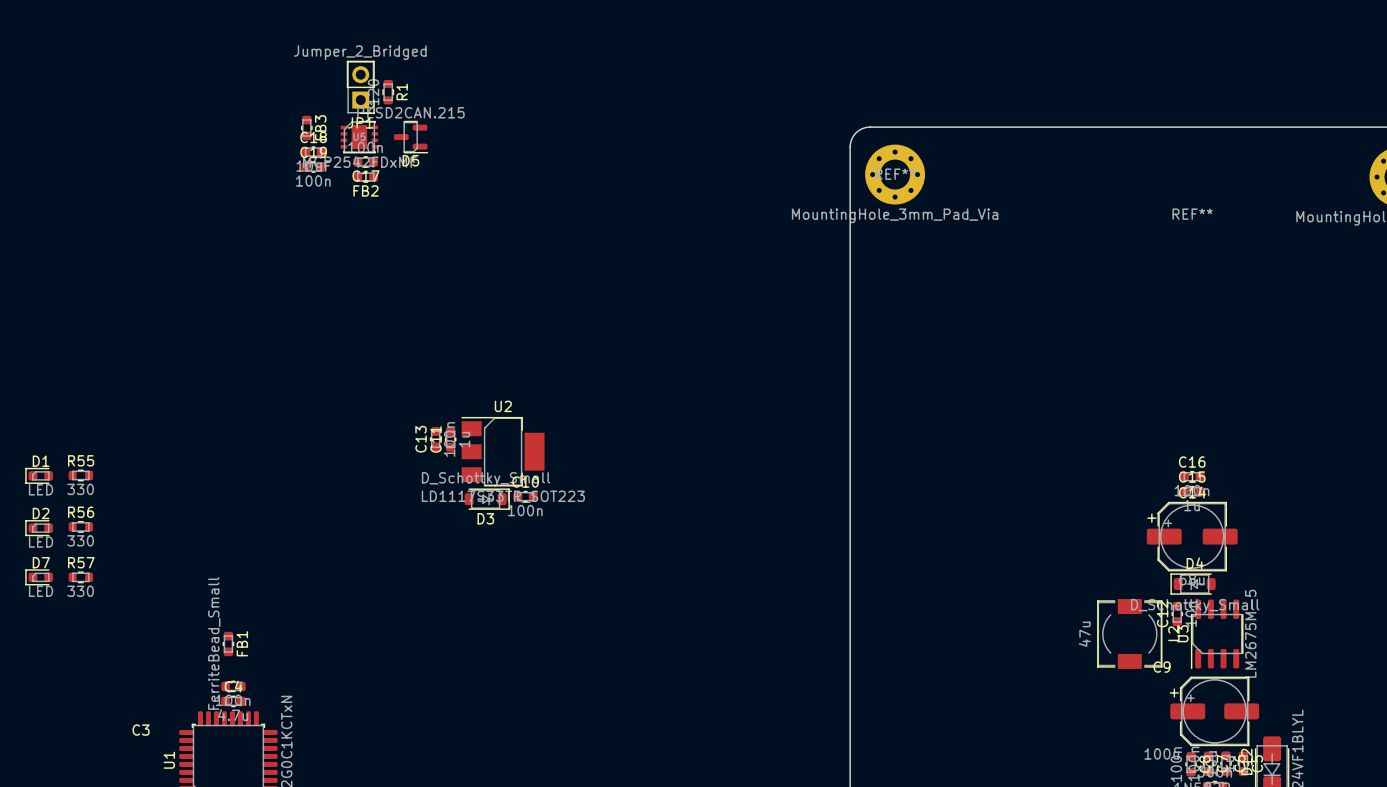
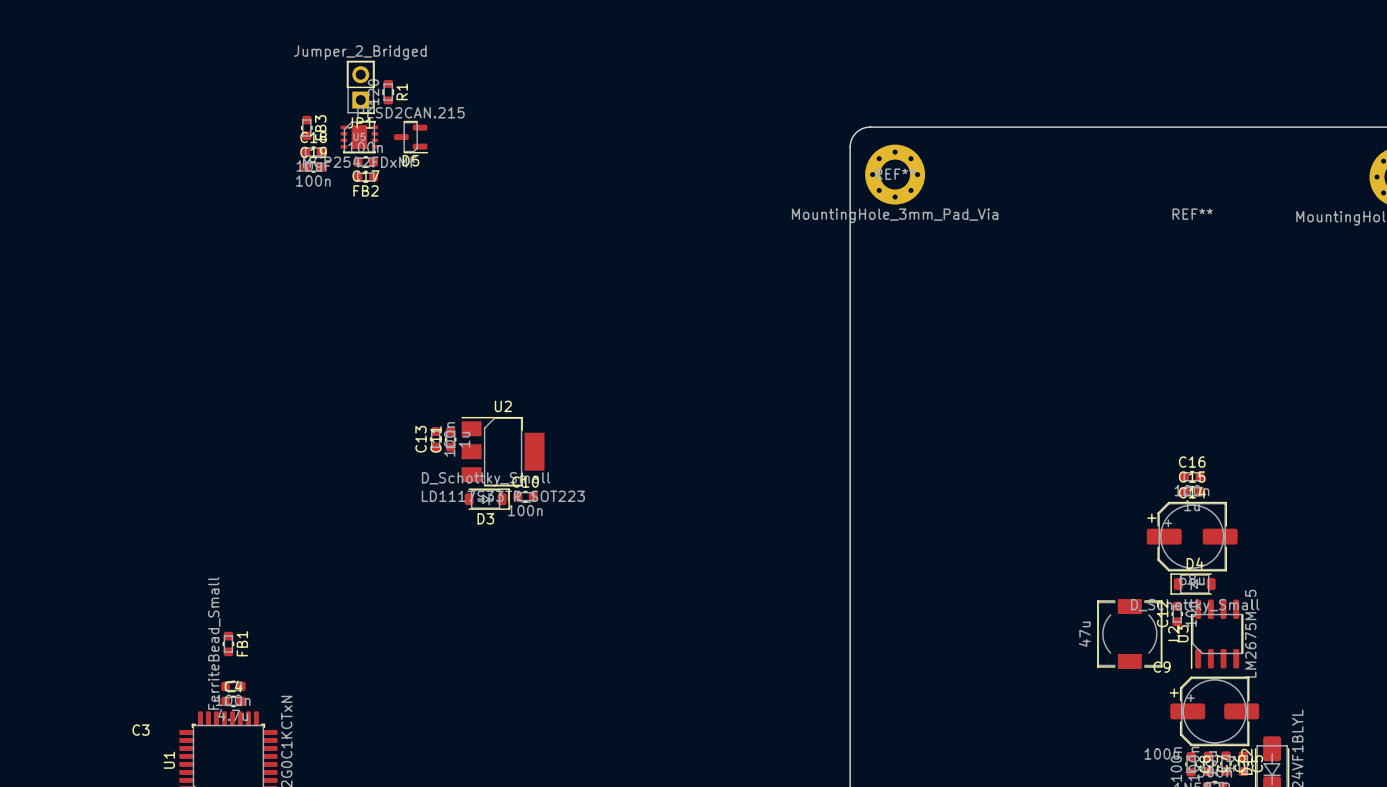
D1: LED (39, 475) -> none
R55: 330 (80, 475) -> none
R56: 330 (80, 526) -> none
D2: LED (39, 528) -> none
D7: LED (39, 577) -> none
R57: 330 (80, 577) -> none

